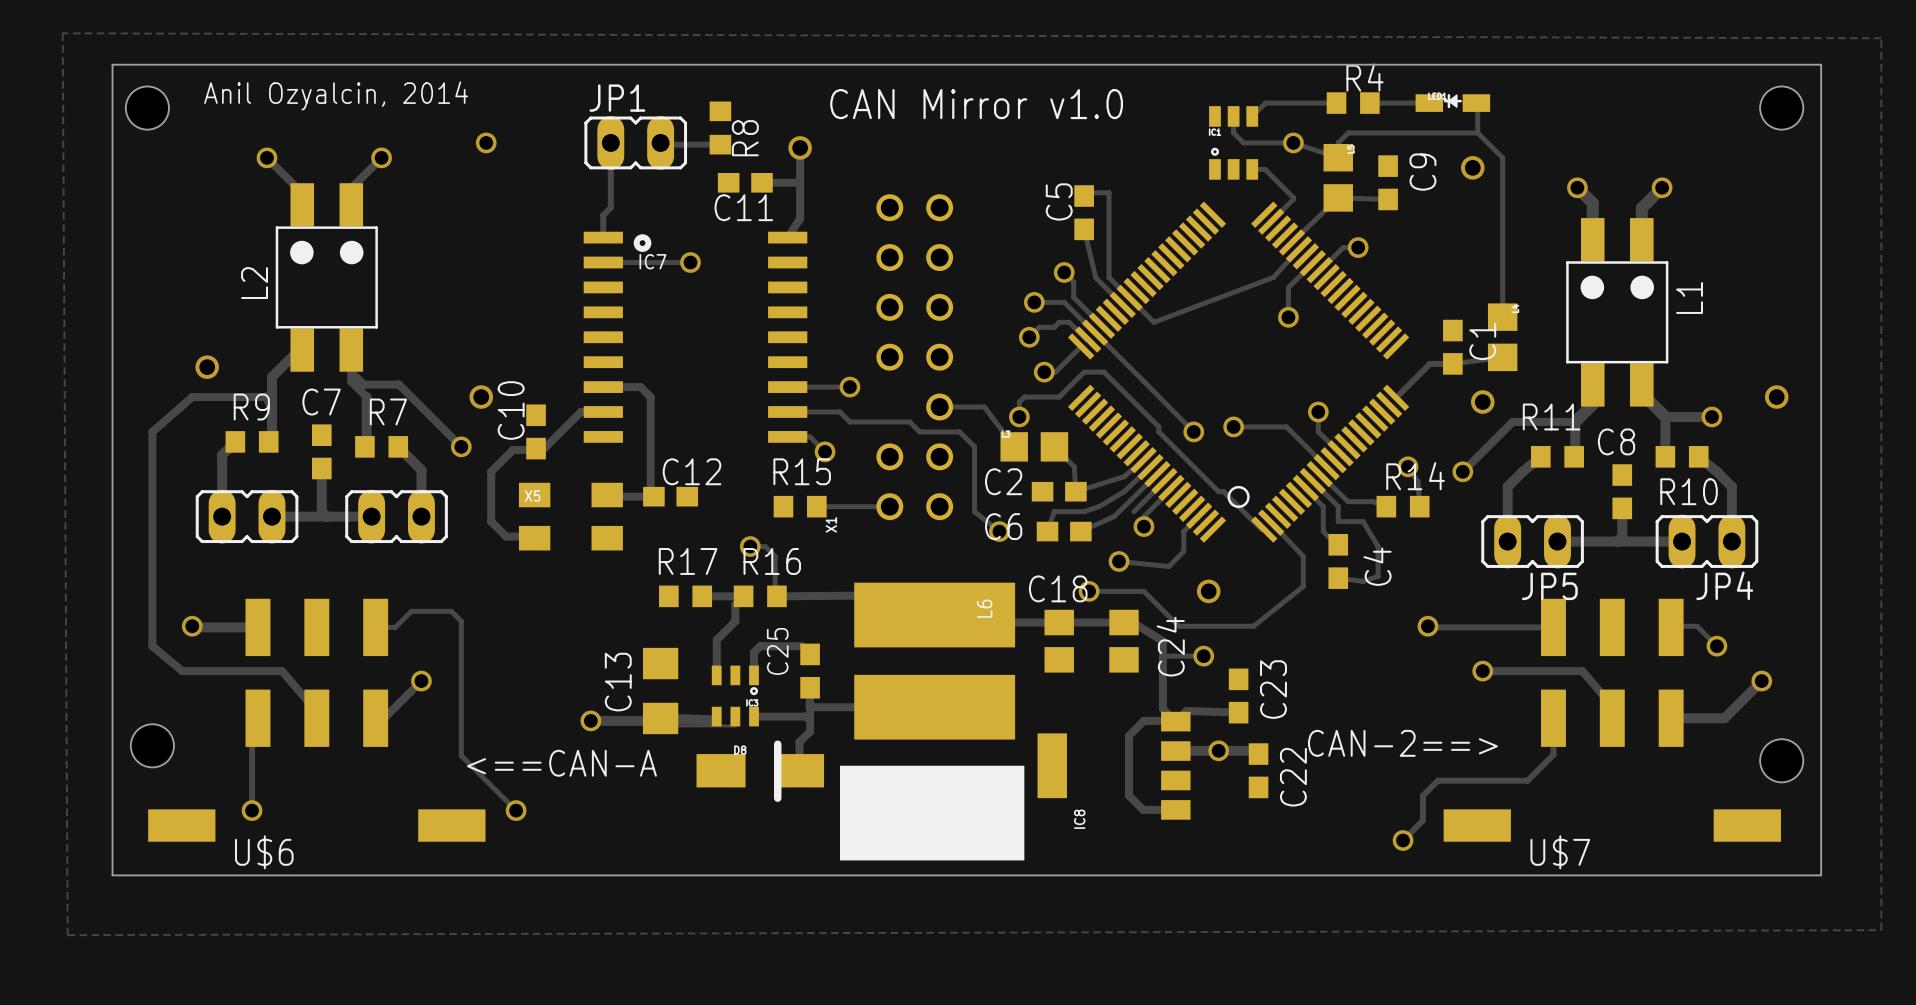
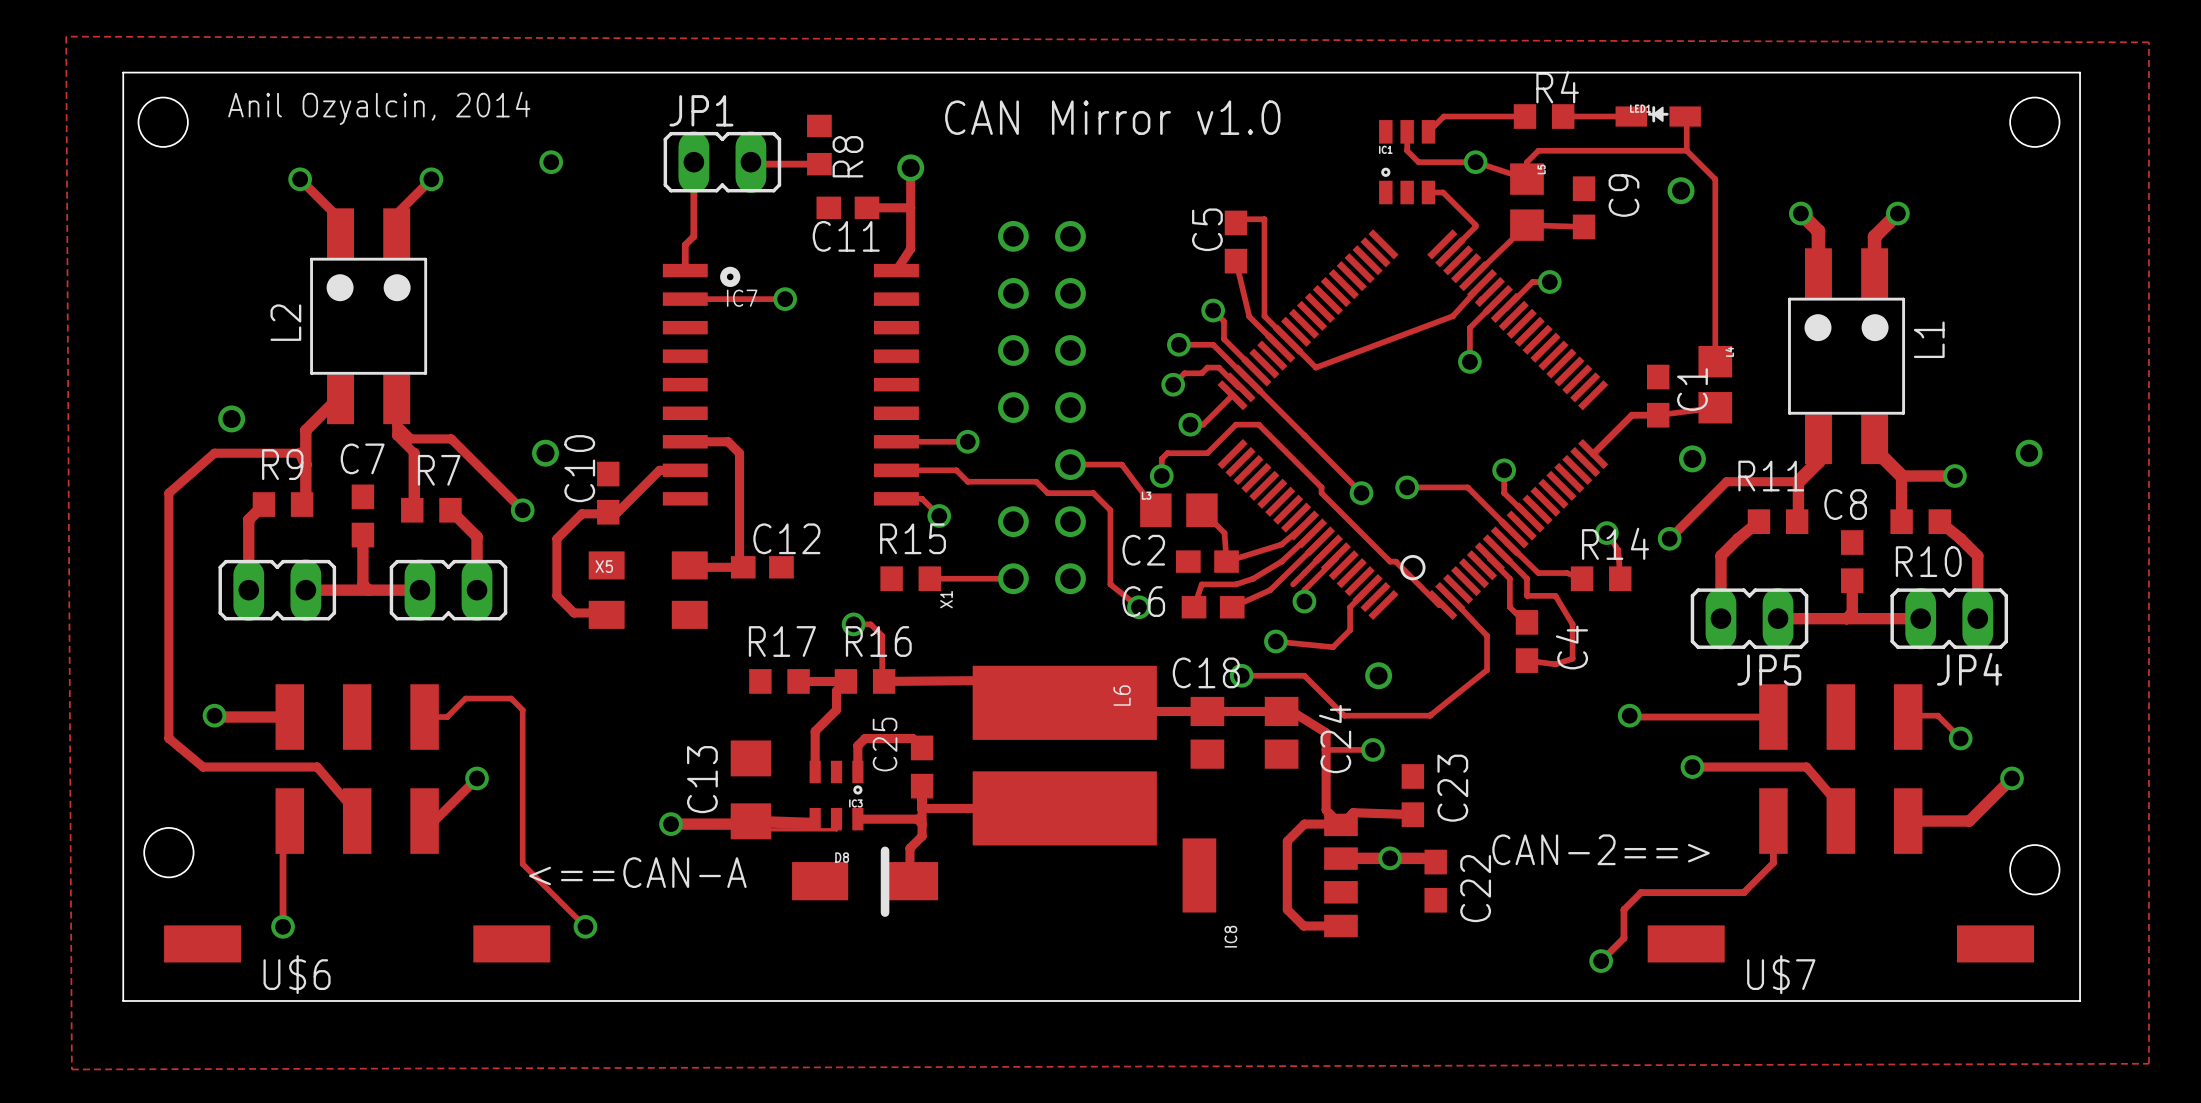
drawing: [839, 765, 1025, 861] -> none

